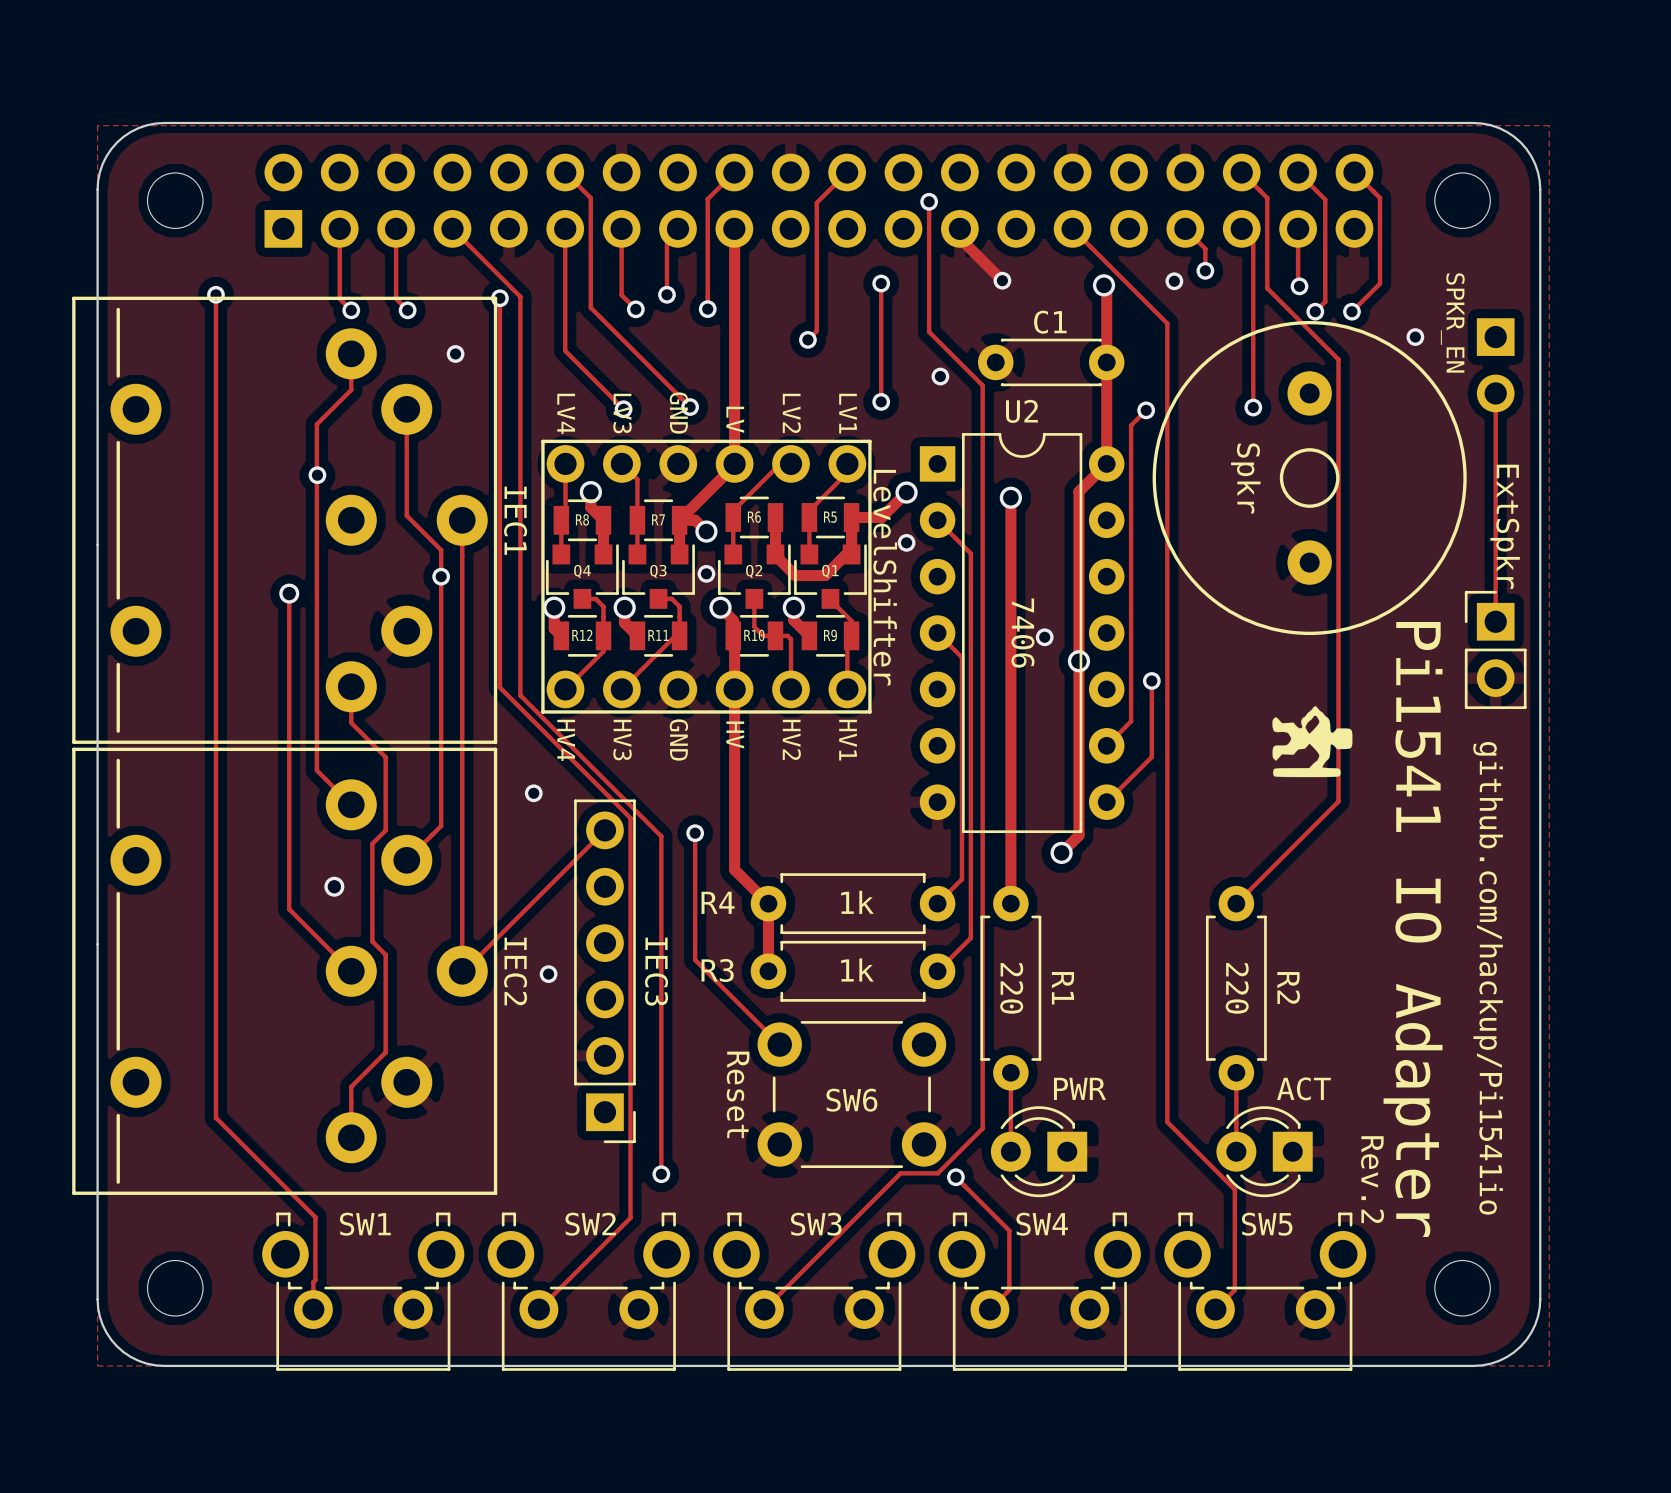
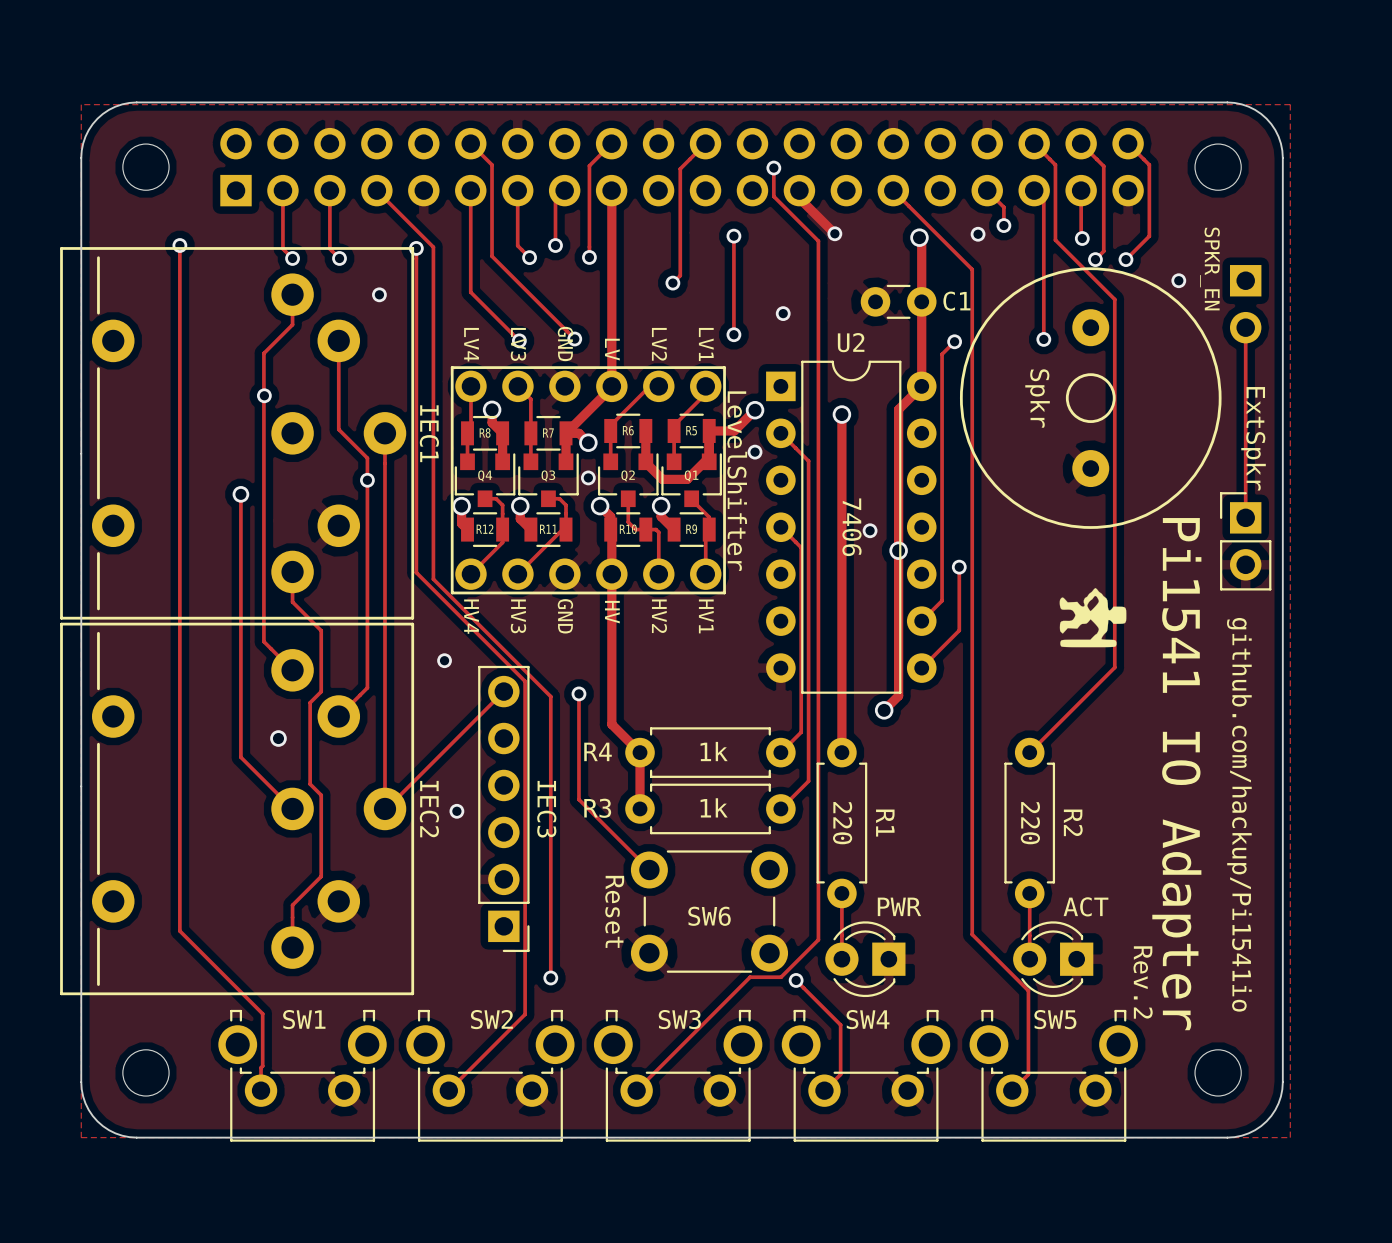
track: (929, 235) (929, 331) (982, 385) -> (773, 196) (818, 241) (818, 321)
C1 name position: C1 (1050, 322) -> C1 (956, 301)
C1 footprint: [977, 338, 1125, 387] -> [860, 284, 937, 319]

